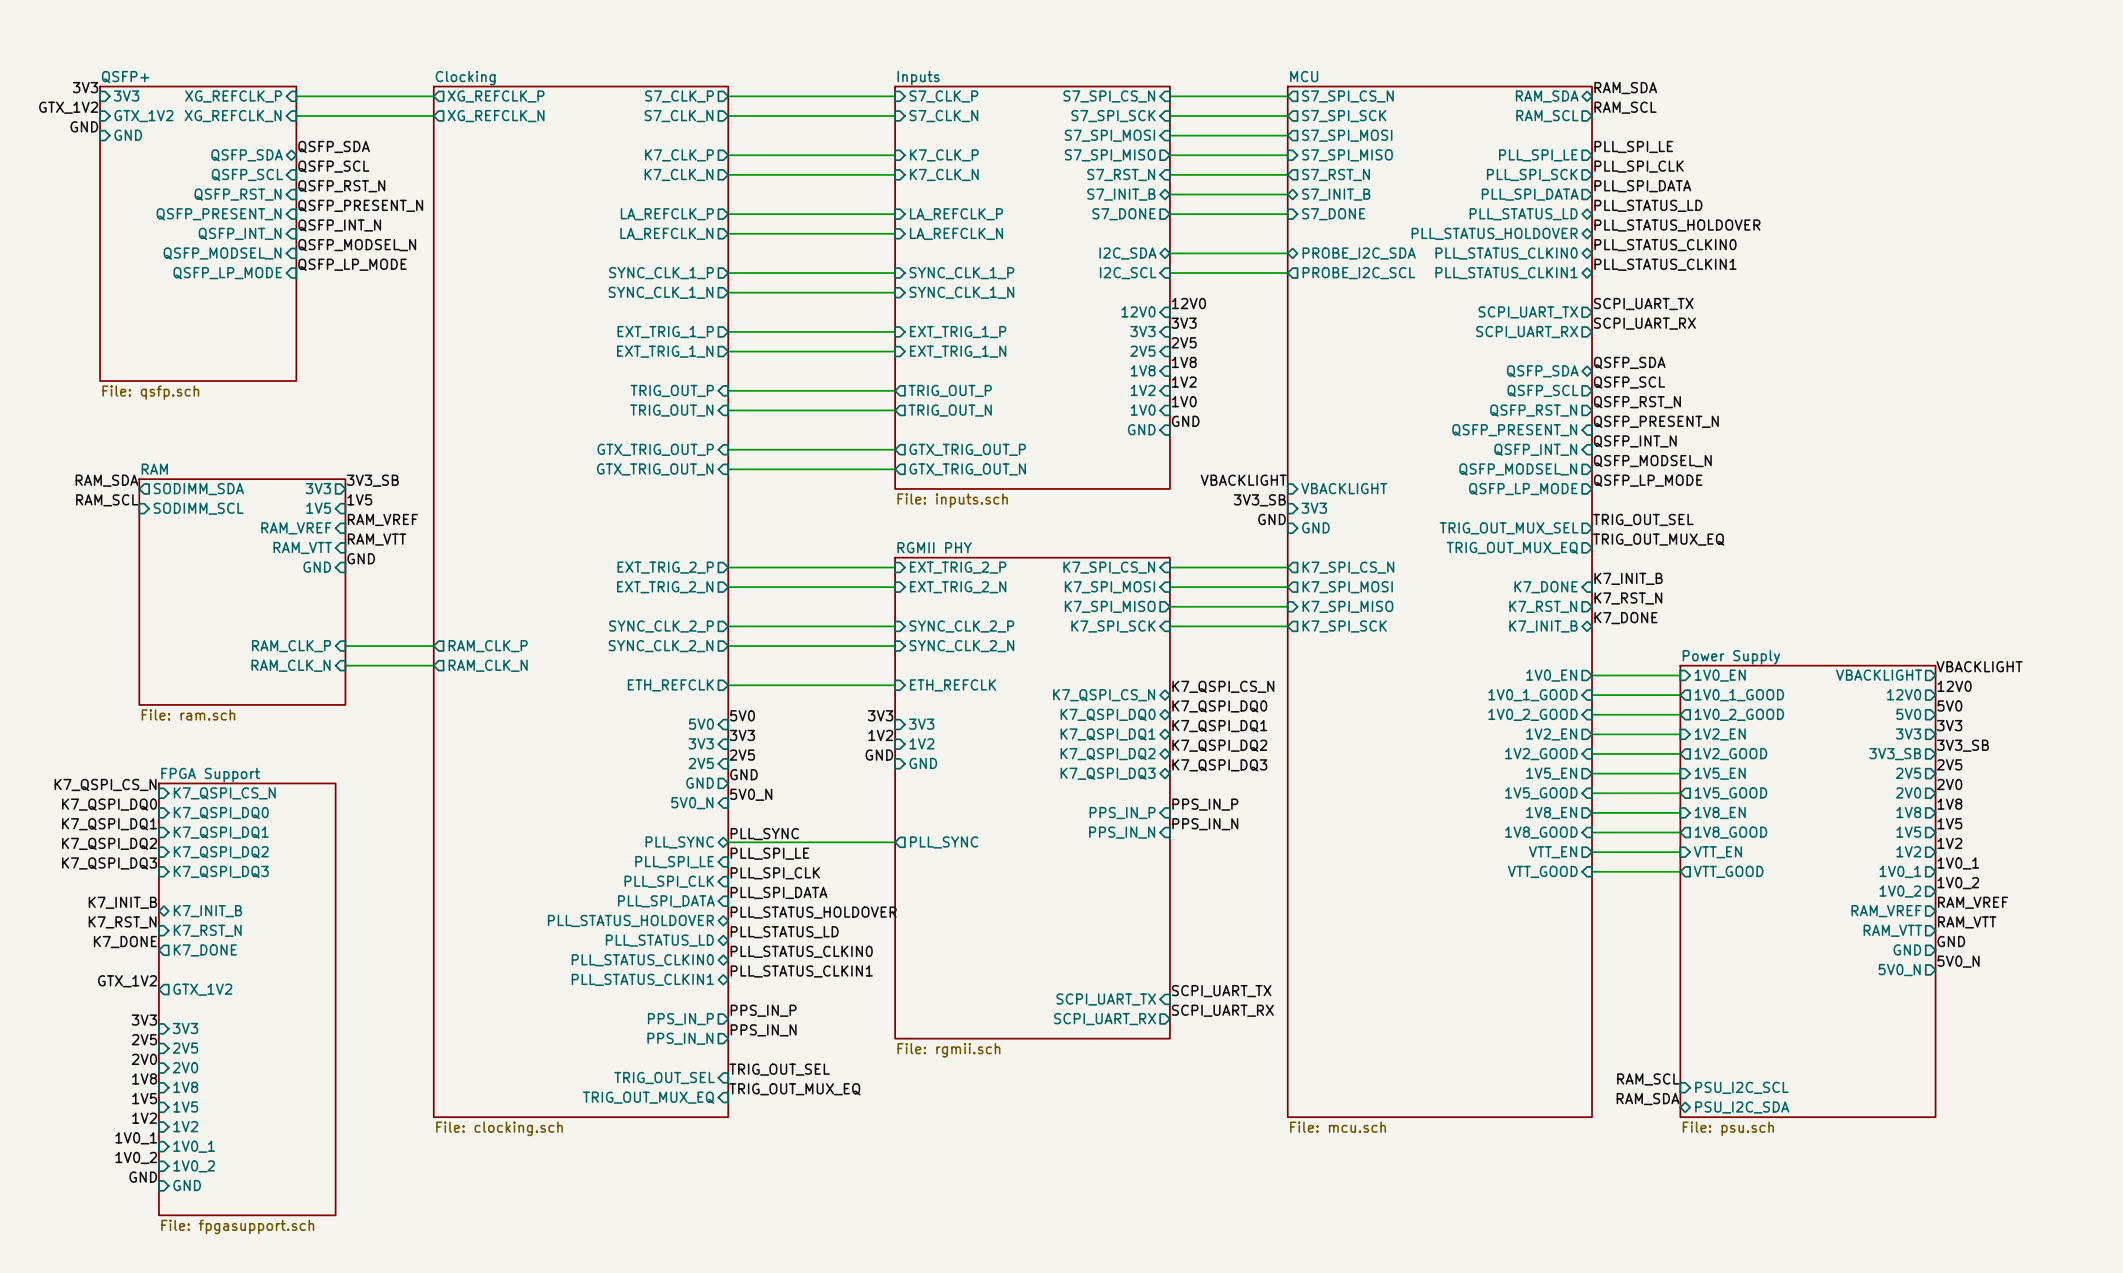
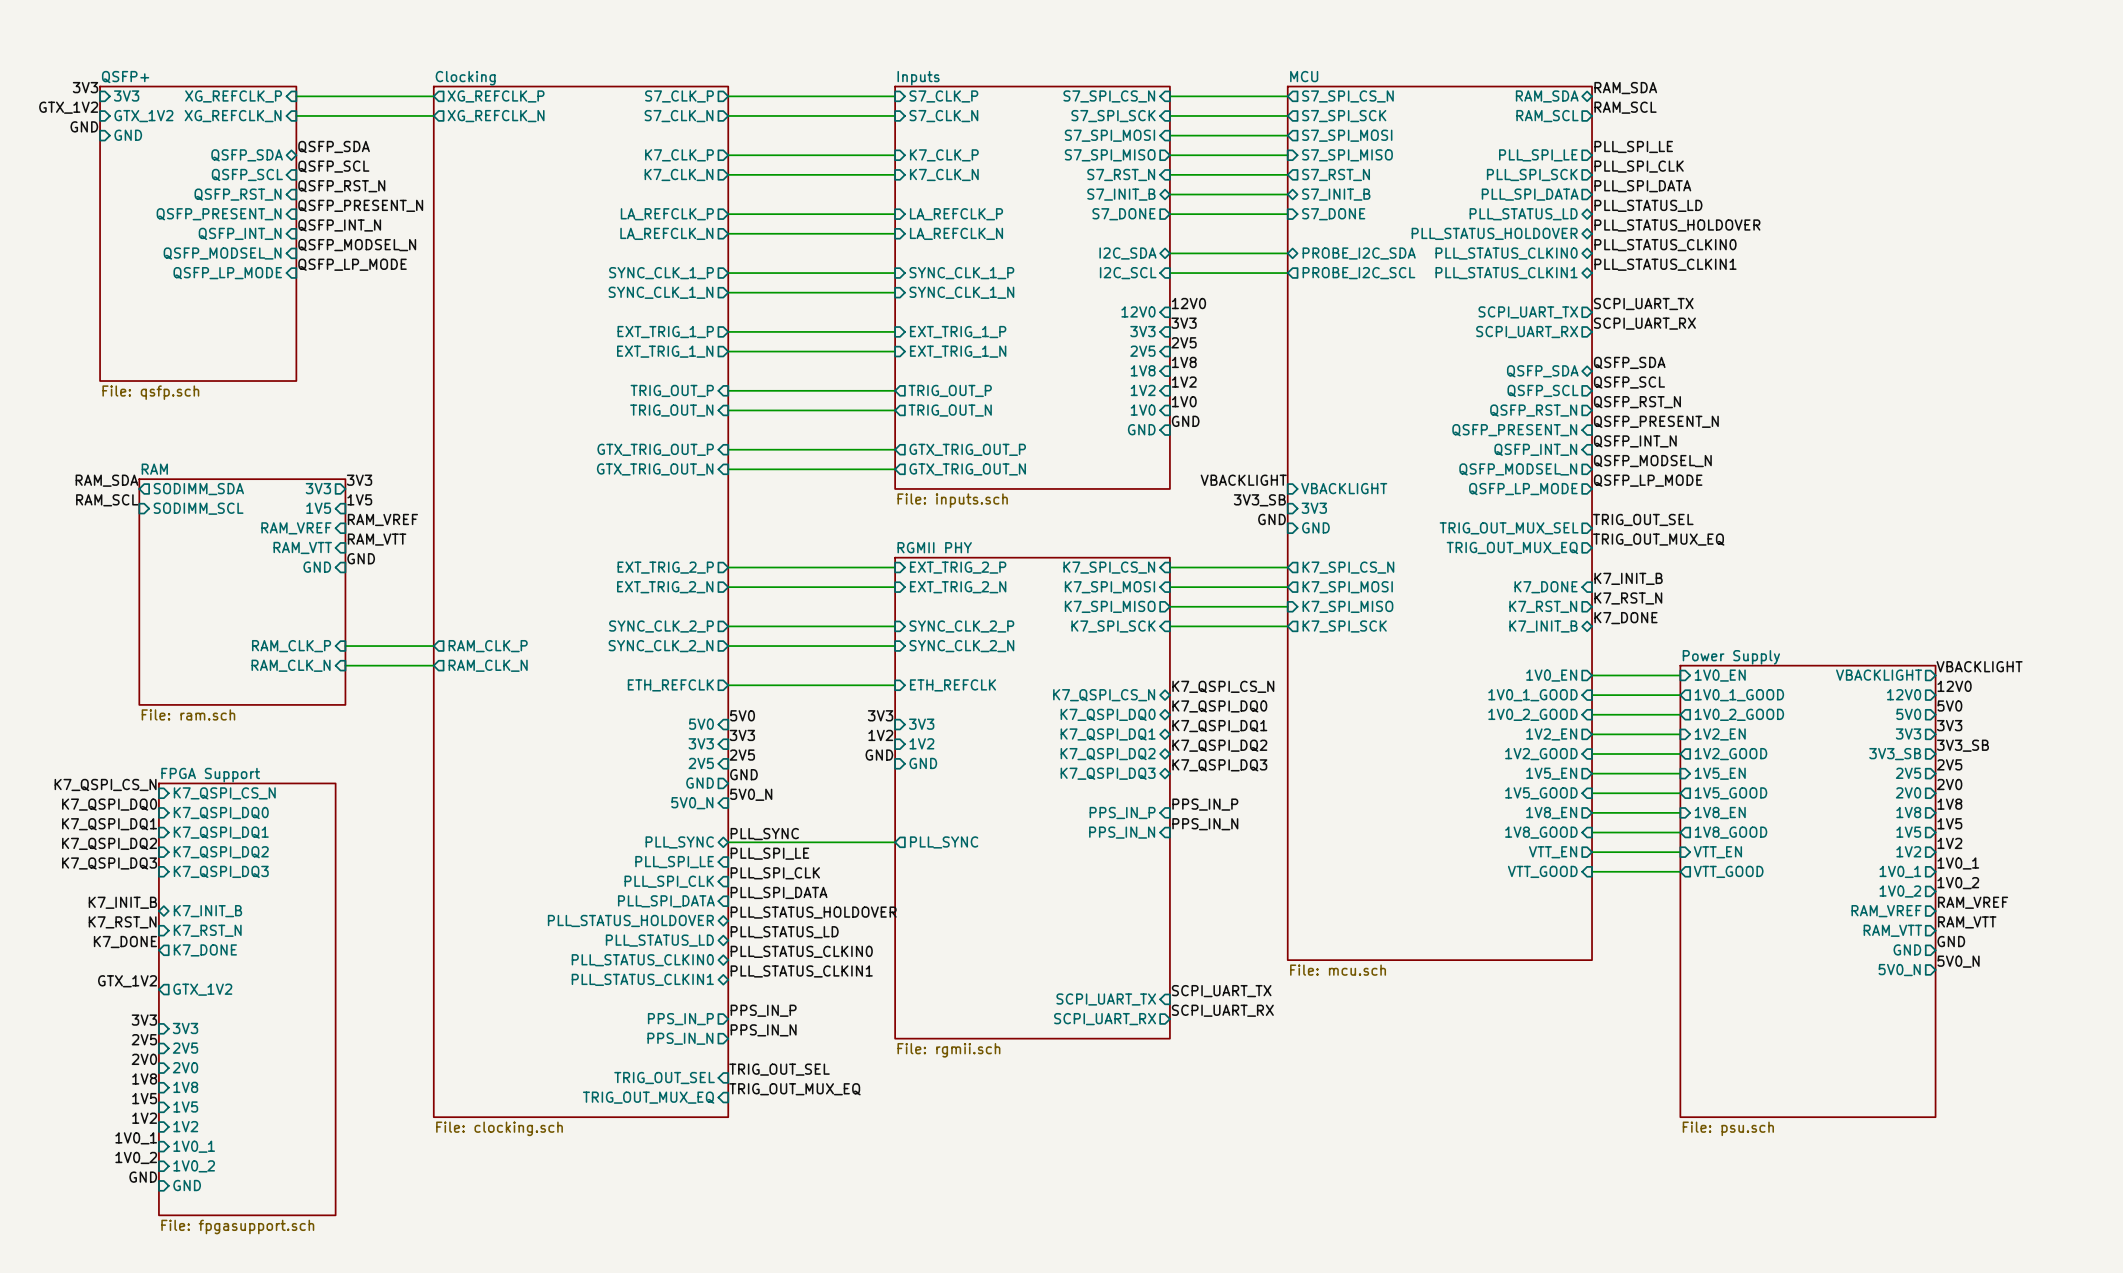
label: 3V3_SB (372, 480) -> 3V3 (359, 480)
sheet MCU: none -> File: mcu.sch (1439, 523)
sheet MCU: File: mcu.sch (1439, 601) -> none
label: RAM_SCL (1648, 1079) -> none
sheet pin: PSU_I2C_SCL (1741, 1087) -> none
label: RAM_SDA (1648, 1099) -> none
sheet pin: PSU_I2C_SDA (1742, 1107) -> none

